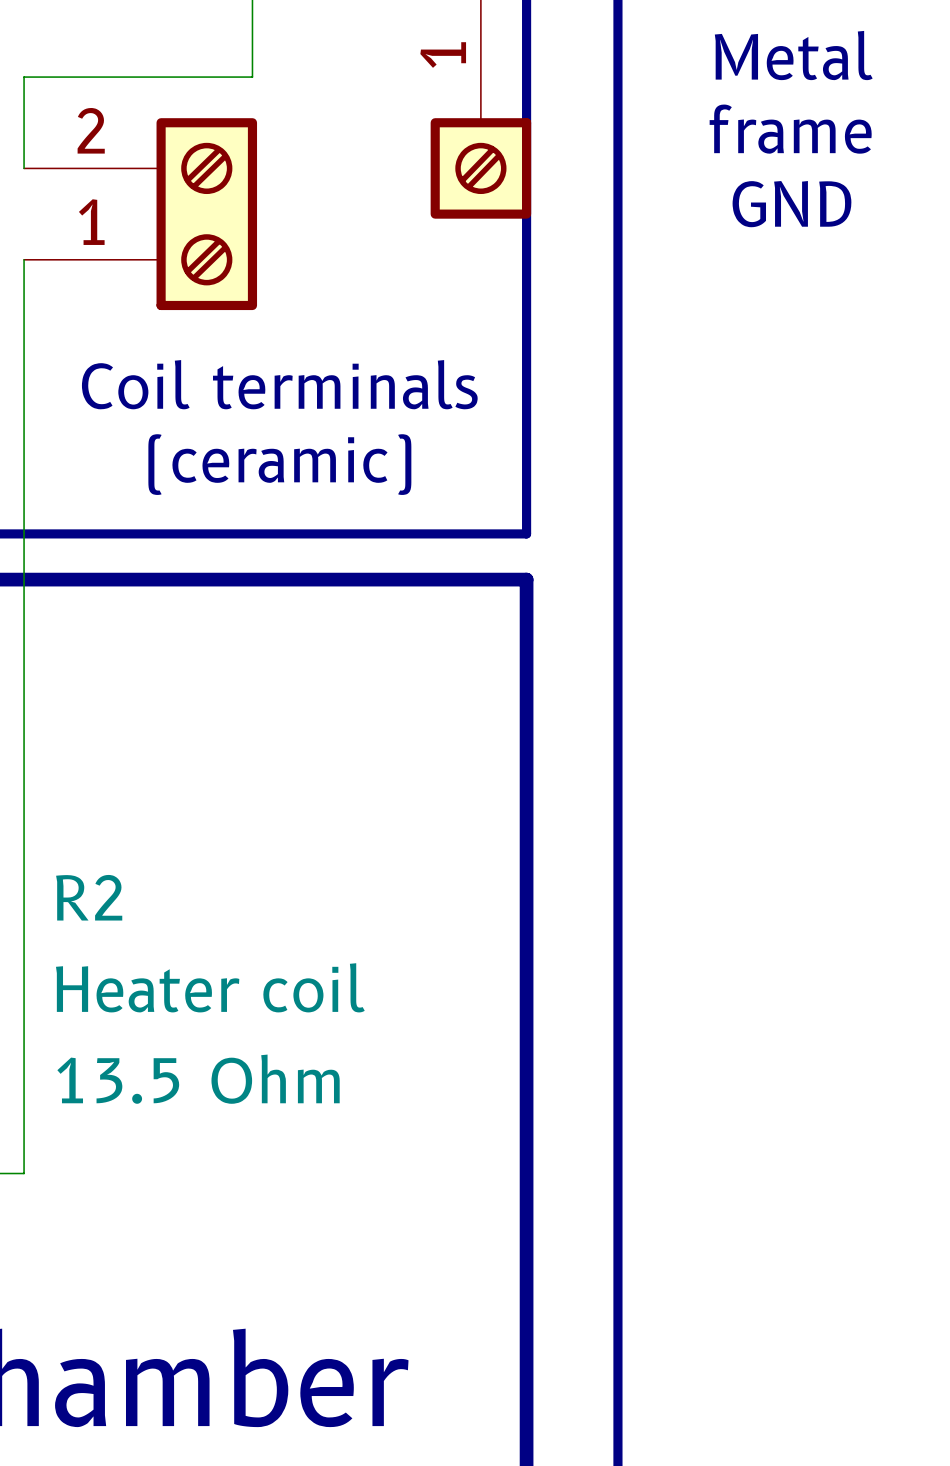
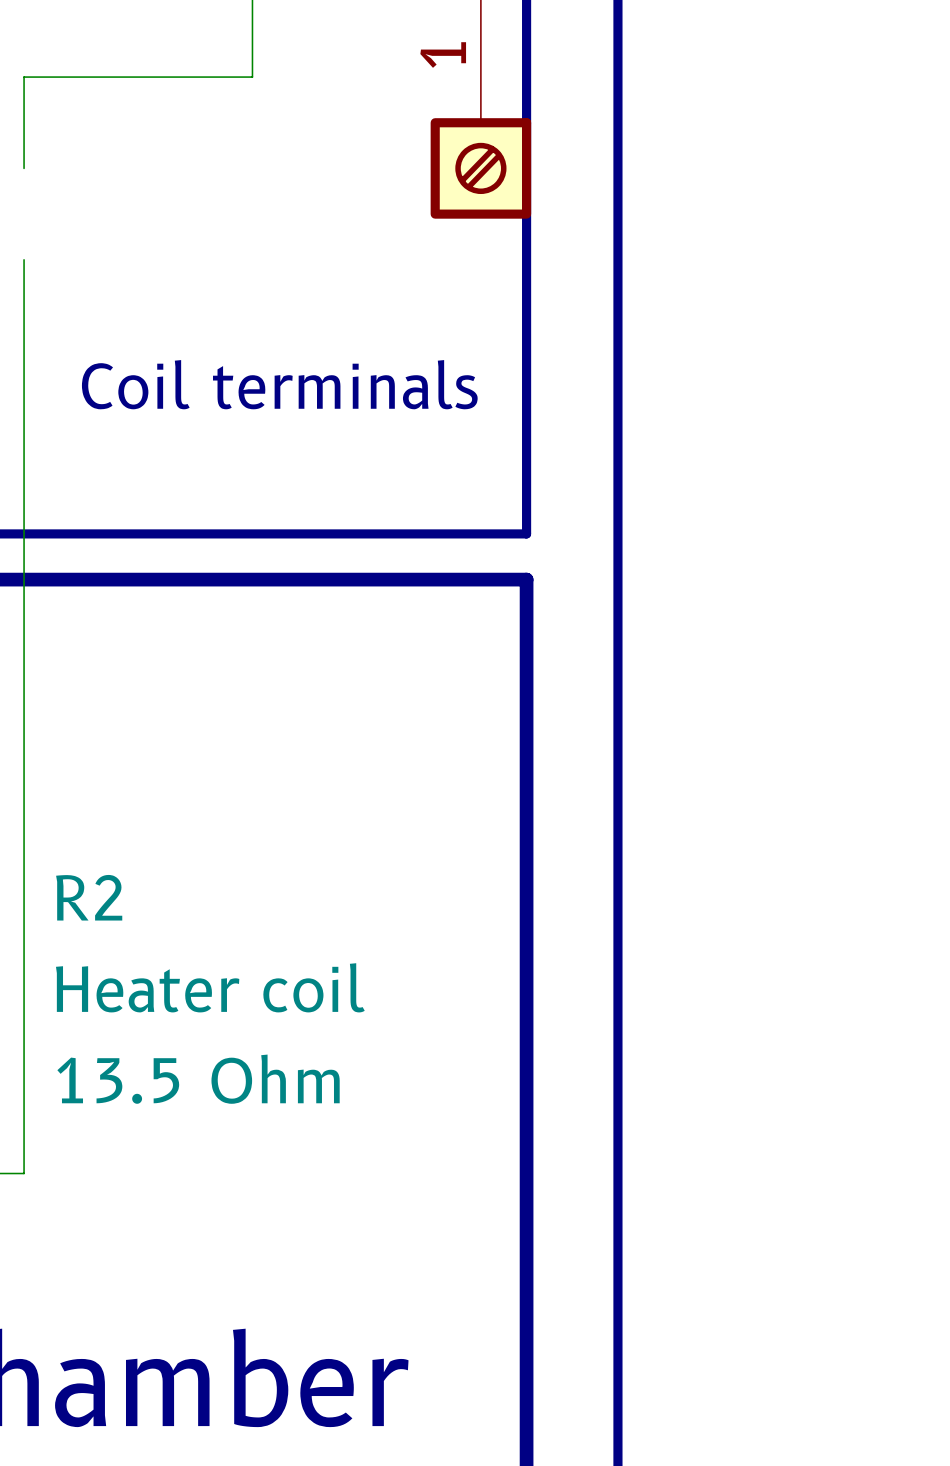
text: Metal (793, 55) -> none
text: frame (790, 129) -> none
text: GND (791, 204) -> none
part: (140, 214) -> none
text: (ceramic) (279, 464) -> none

